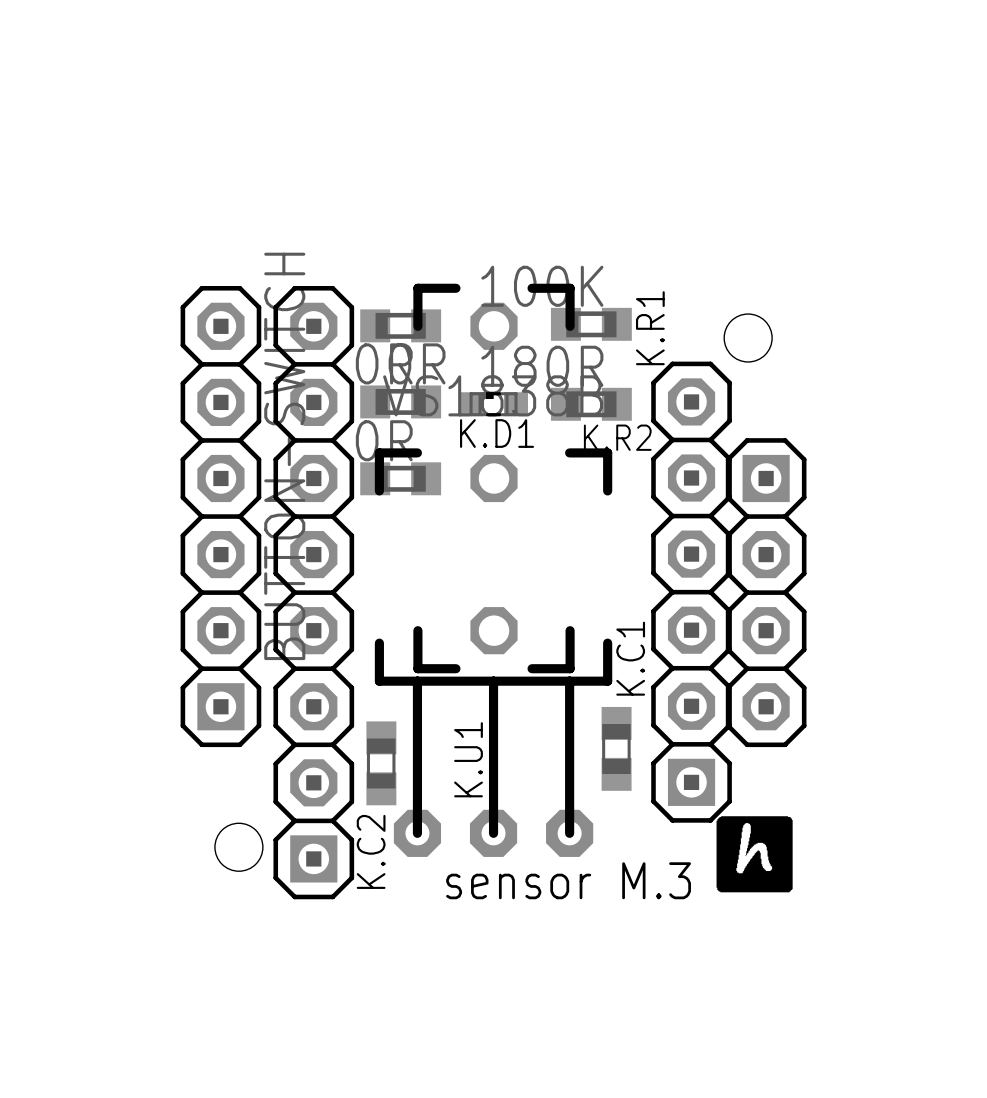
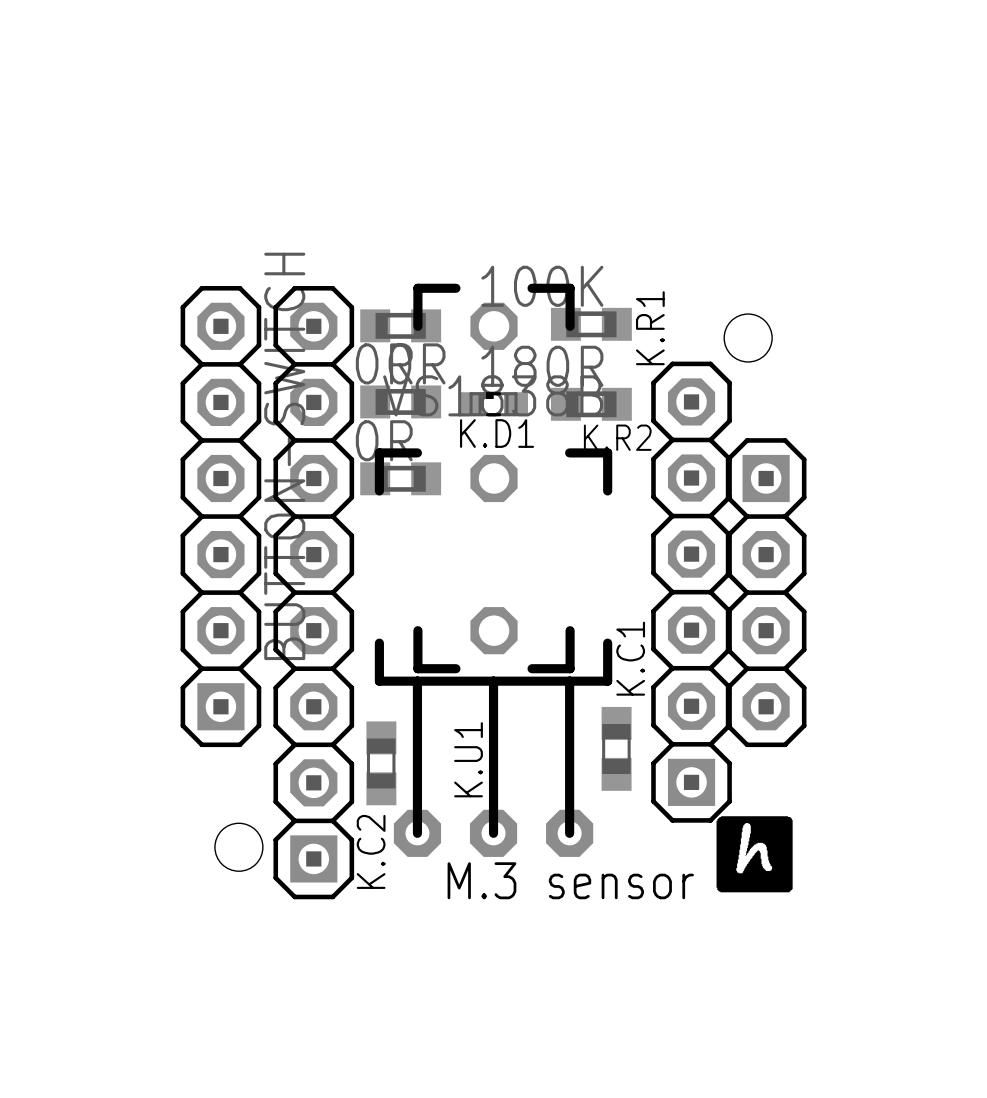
text: sensor M.3 (568, 880) -> M.3 sensor (570, 880)

